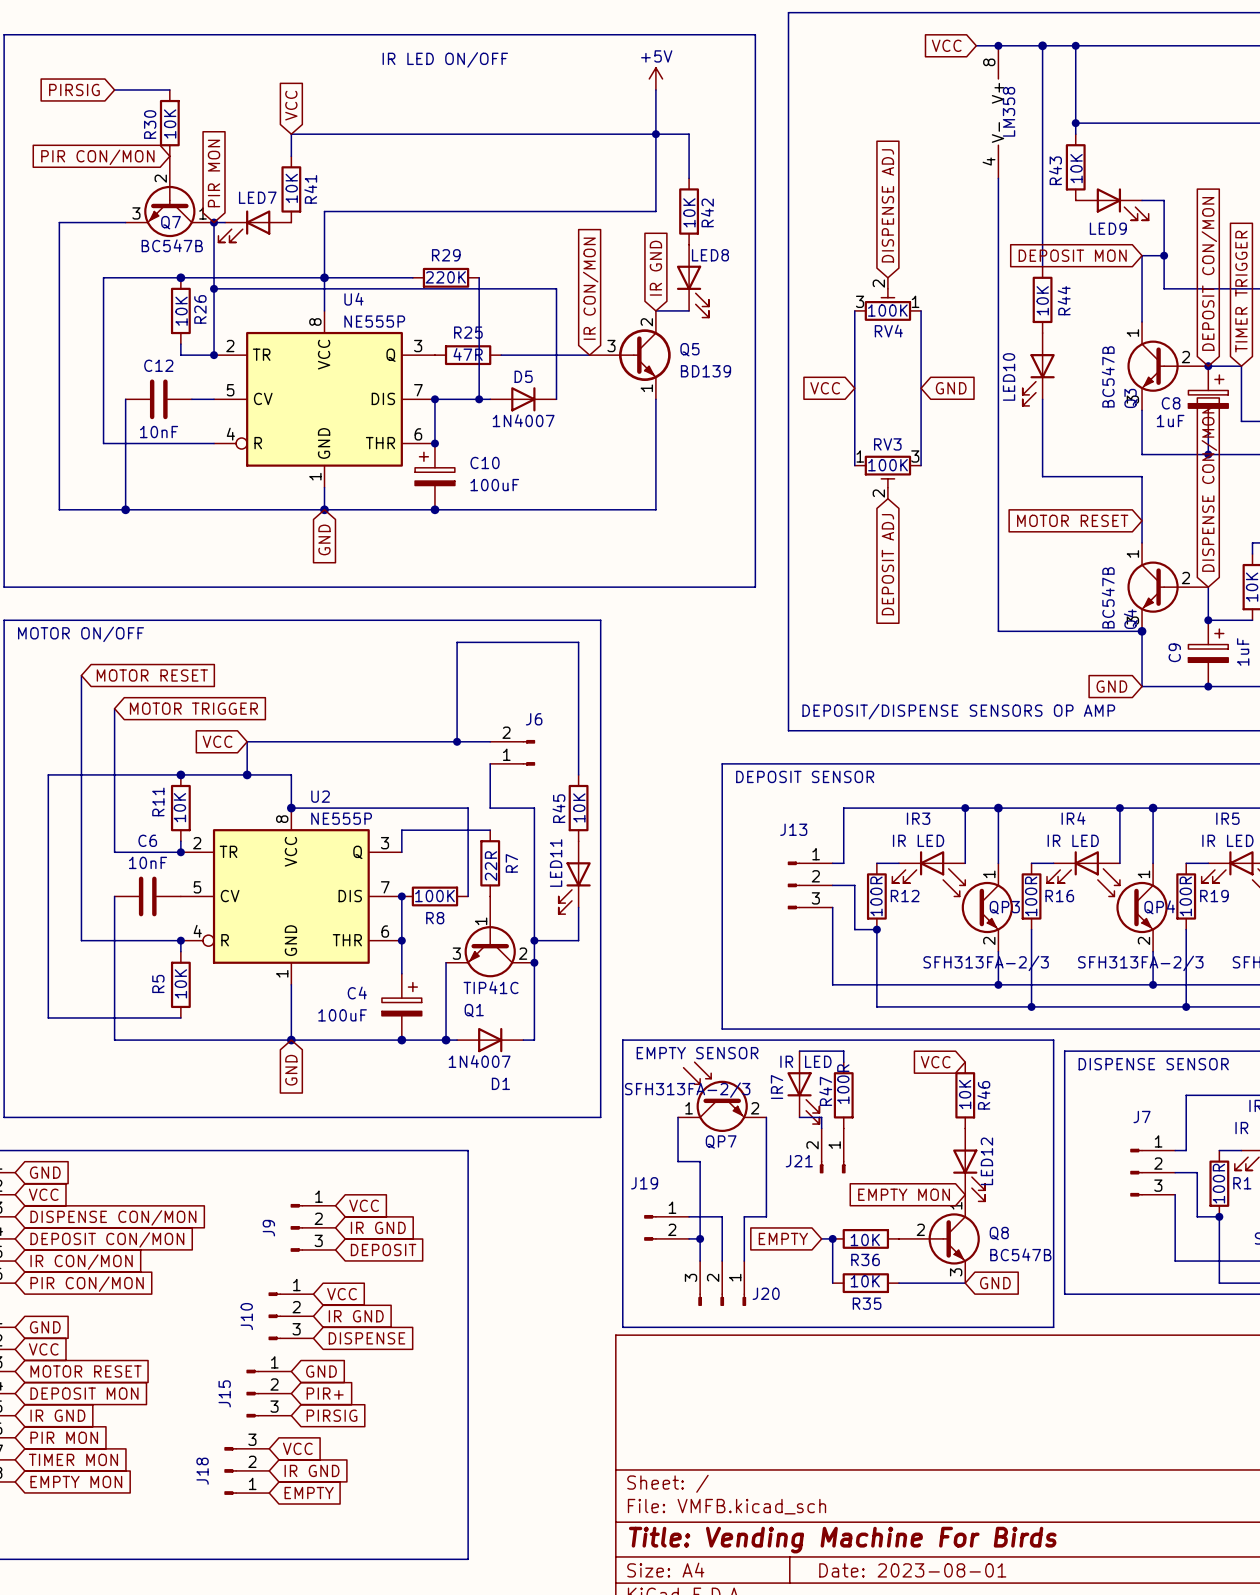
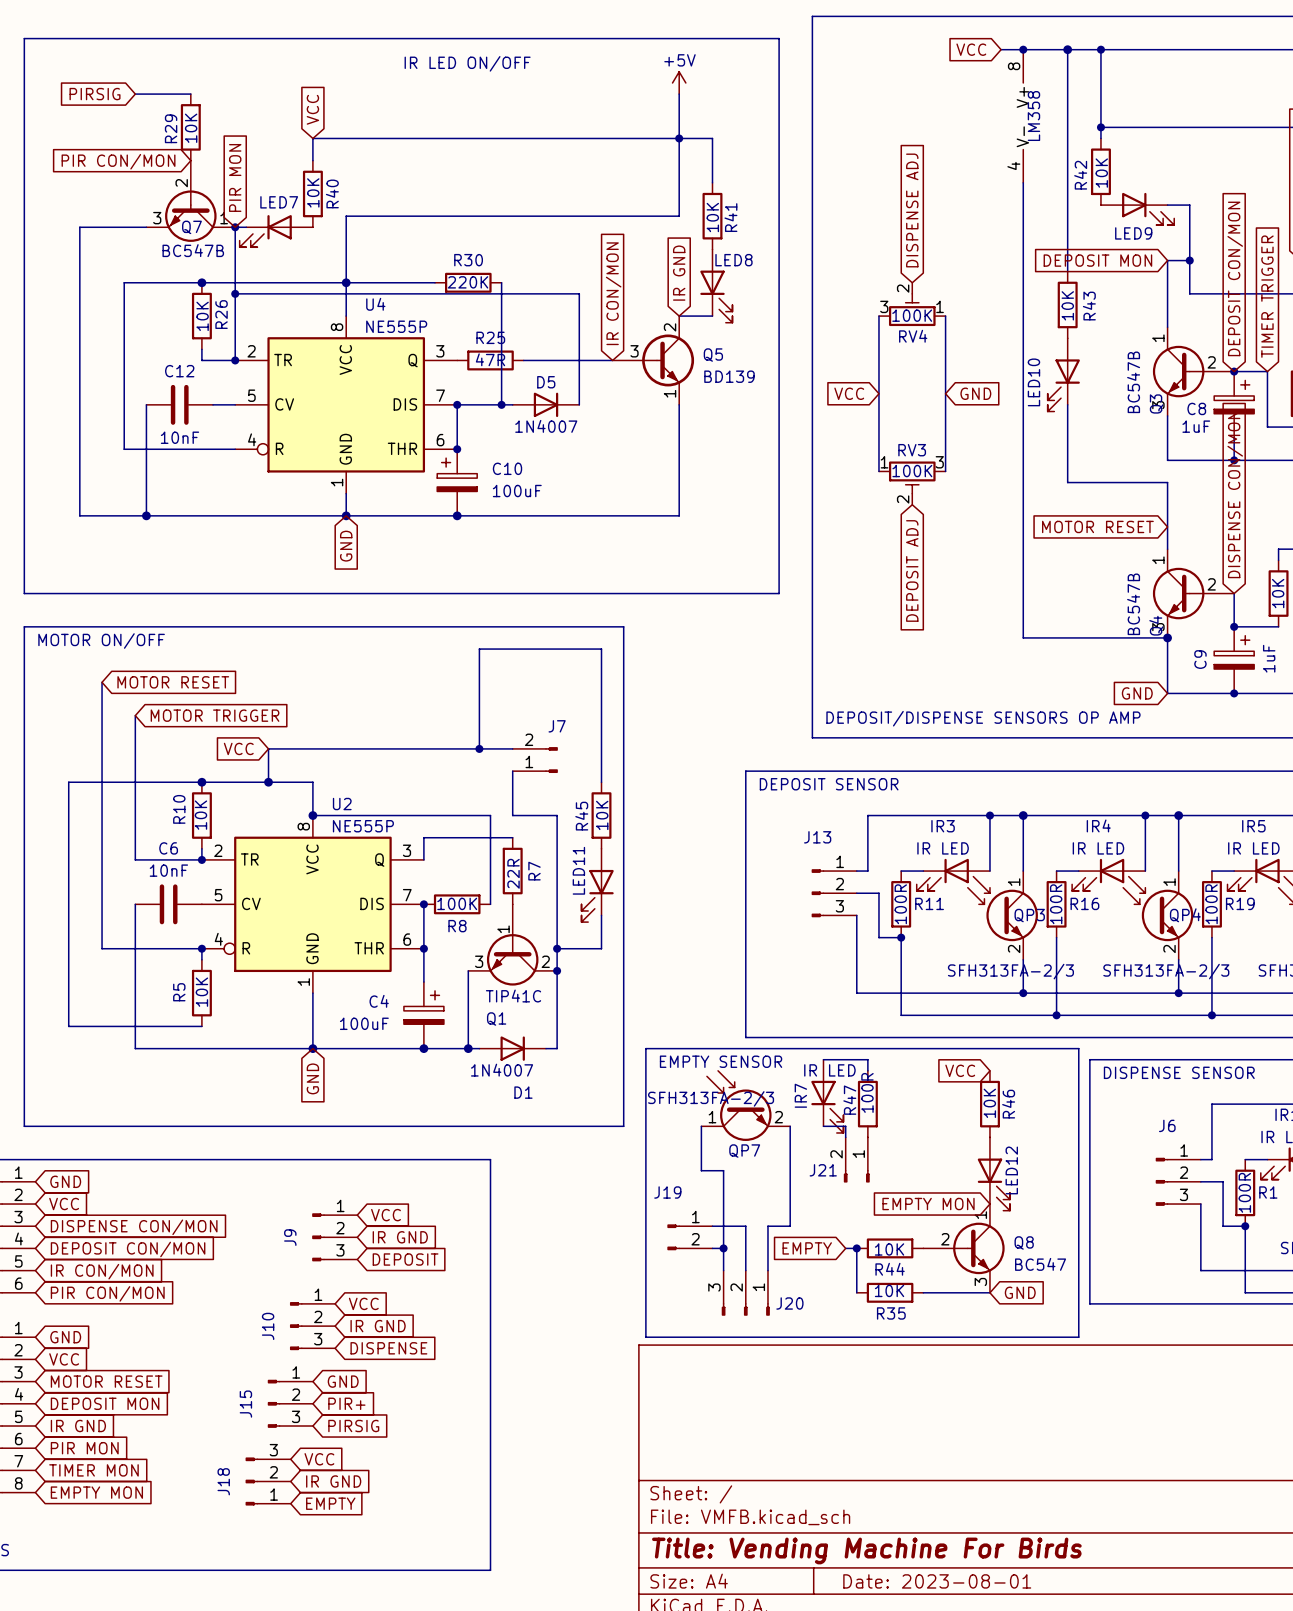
R30 name: R30 (150, 124) -> R29 (171, 128)
R43 name: R43 (1055, 170) -> R42 (1080, 175)
R41 name: R41 (310, 189) -> R40 (332, 193)
R42 name: R42 (707, 212) -> R41 (730, 217)
R29 name: R29 (446, 255) -> R30 (468, 260)
R44 name: R44 (1064, 300) -> R43 (1089, 306)
J6 name: J6 (534, 719) -> J7 (557, 726)
R11 name: R11 (158, 801) -> R10 (179, 809)
R12 name: R12 (905, 896) -> R11 (929, 903)
J7 name: J7 (1142, 1117) -> J6 (1167, 1125)
Q8 value: BC547B (1020, 1254) -> BC547 (1040, 1264)
R36 name: R36 (865, 1259) -> R44 (890, 1269)

